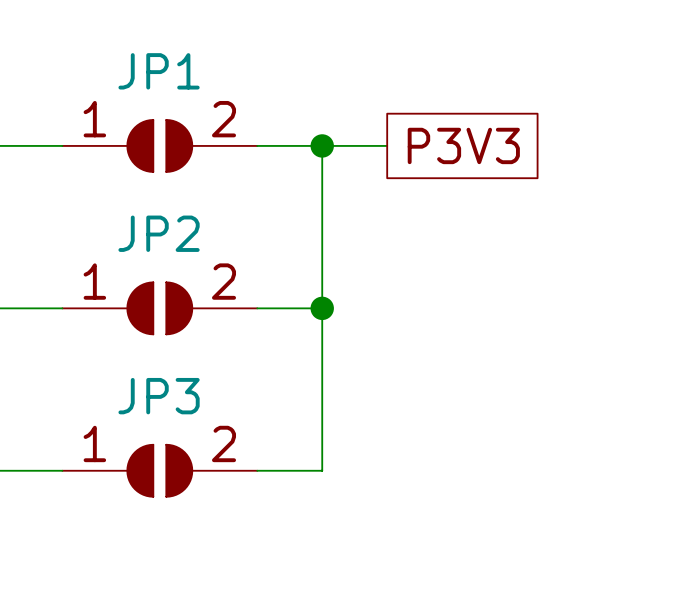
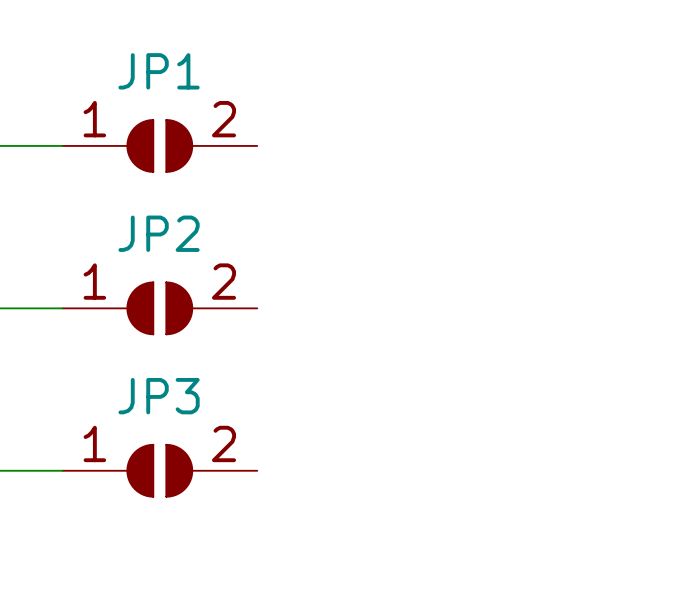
wire: (257, 145) (387, 145) -> none
wire: (322, 145) (322, 470) (257, 470) -> none
junction: (322, 145) -> none
global label: P3V3 (463, 145) -> none
wire: (257, 308) (322, 308) -> none
junction: (322, 308) -> none

